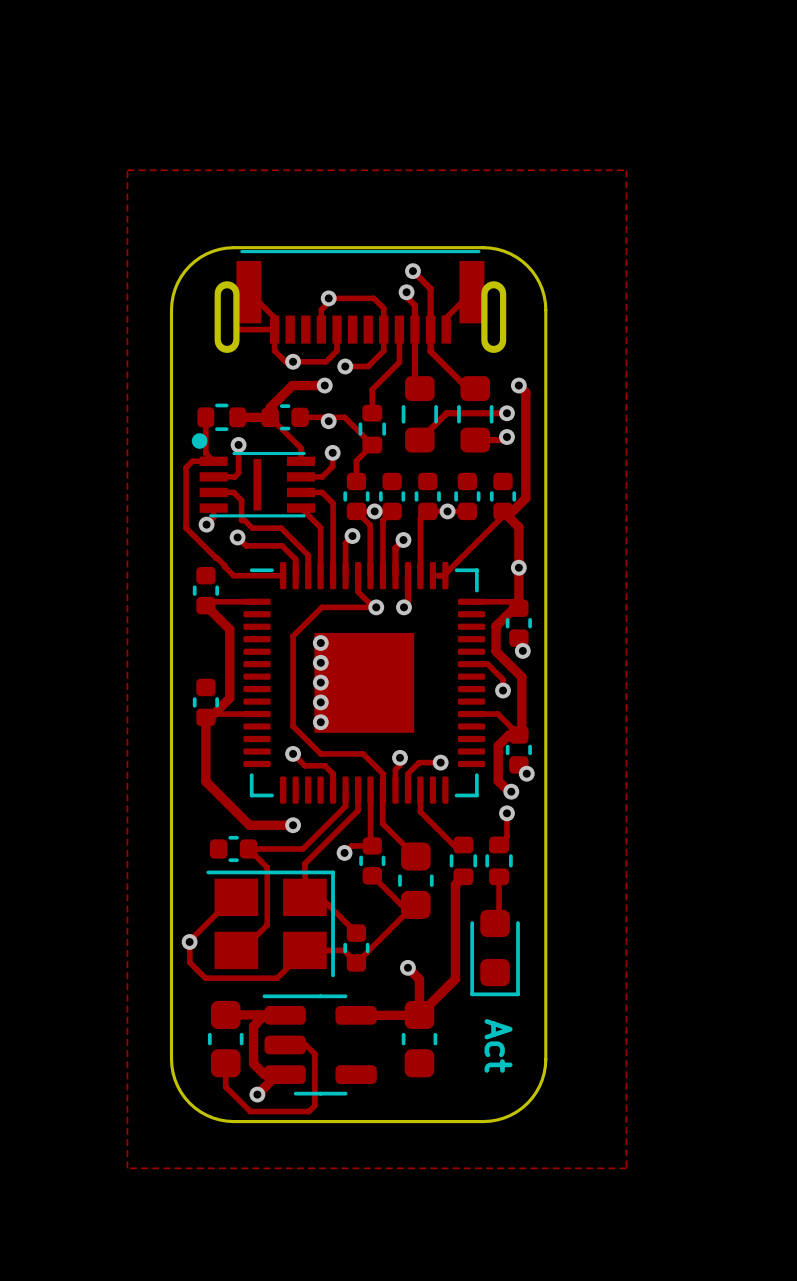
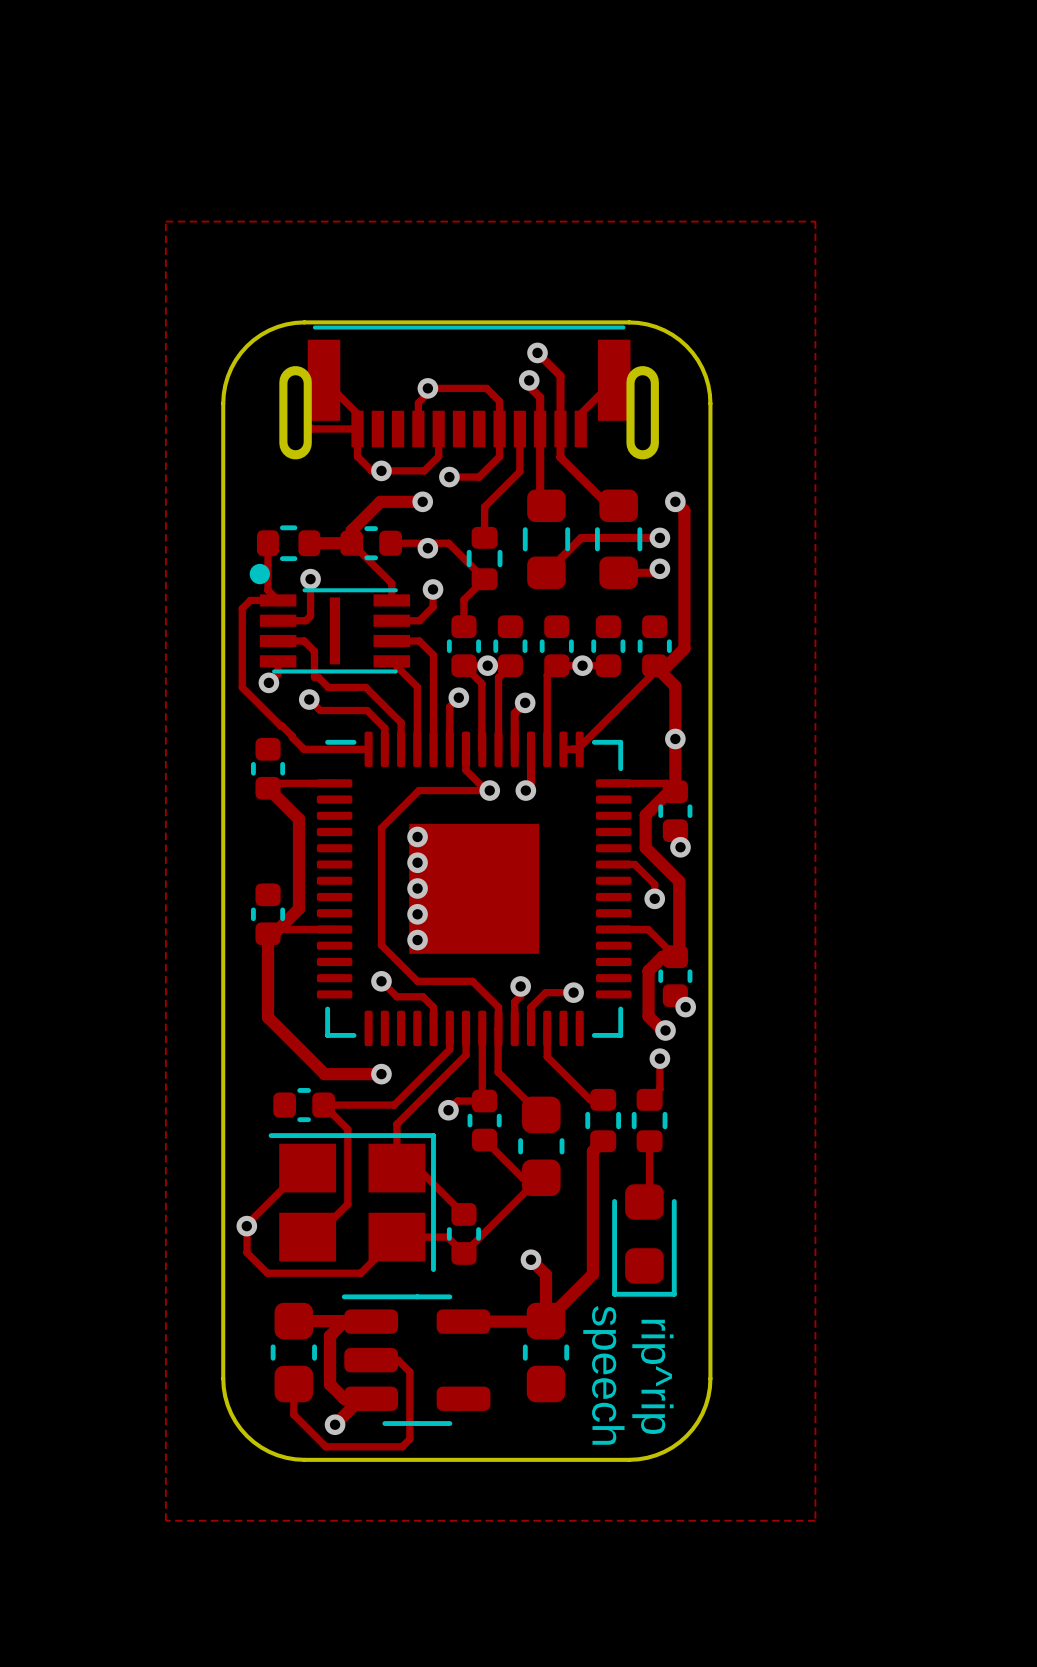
text: Act (498, 1045) -> none
text: none -> speech (603, 1375)
text: none -> rip^rip (652, 1376)

